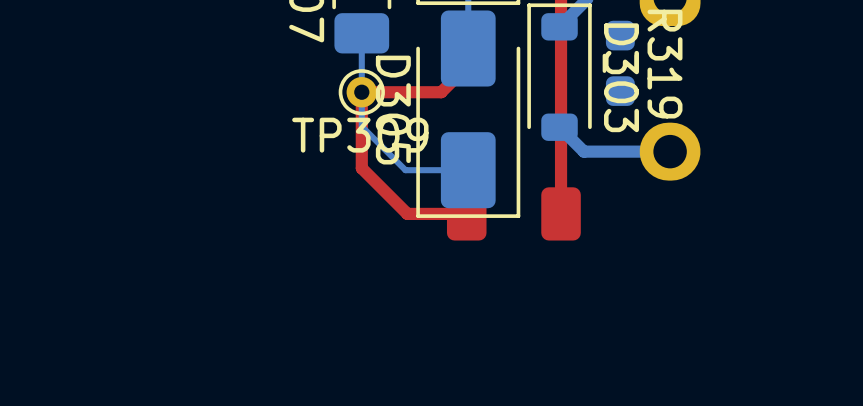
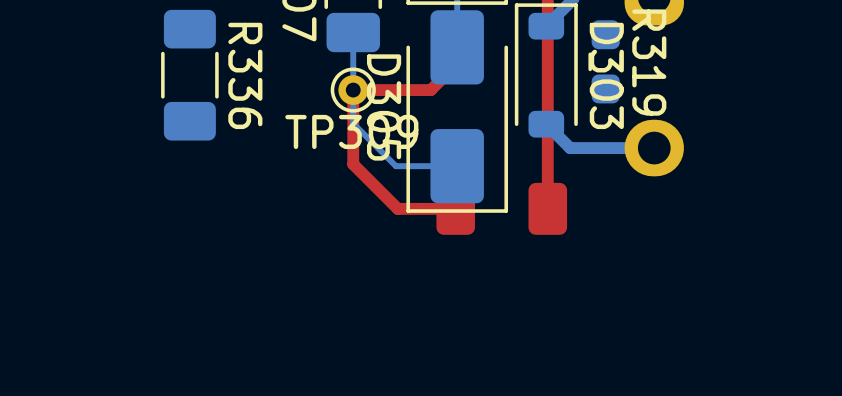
R336: none -> (189, 75)

